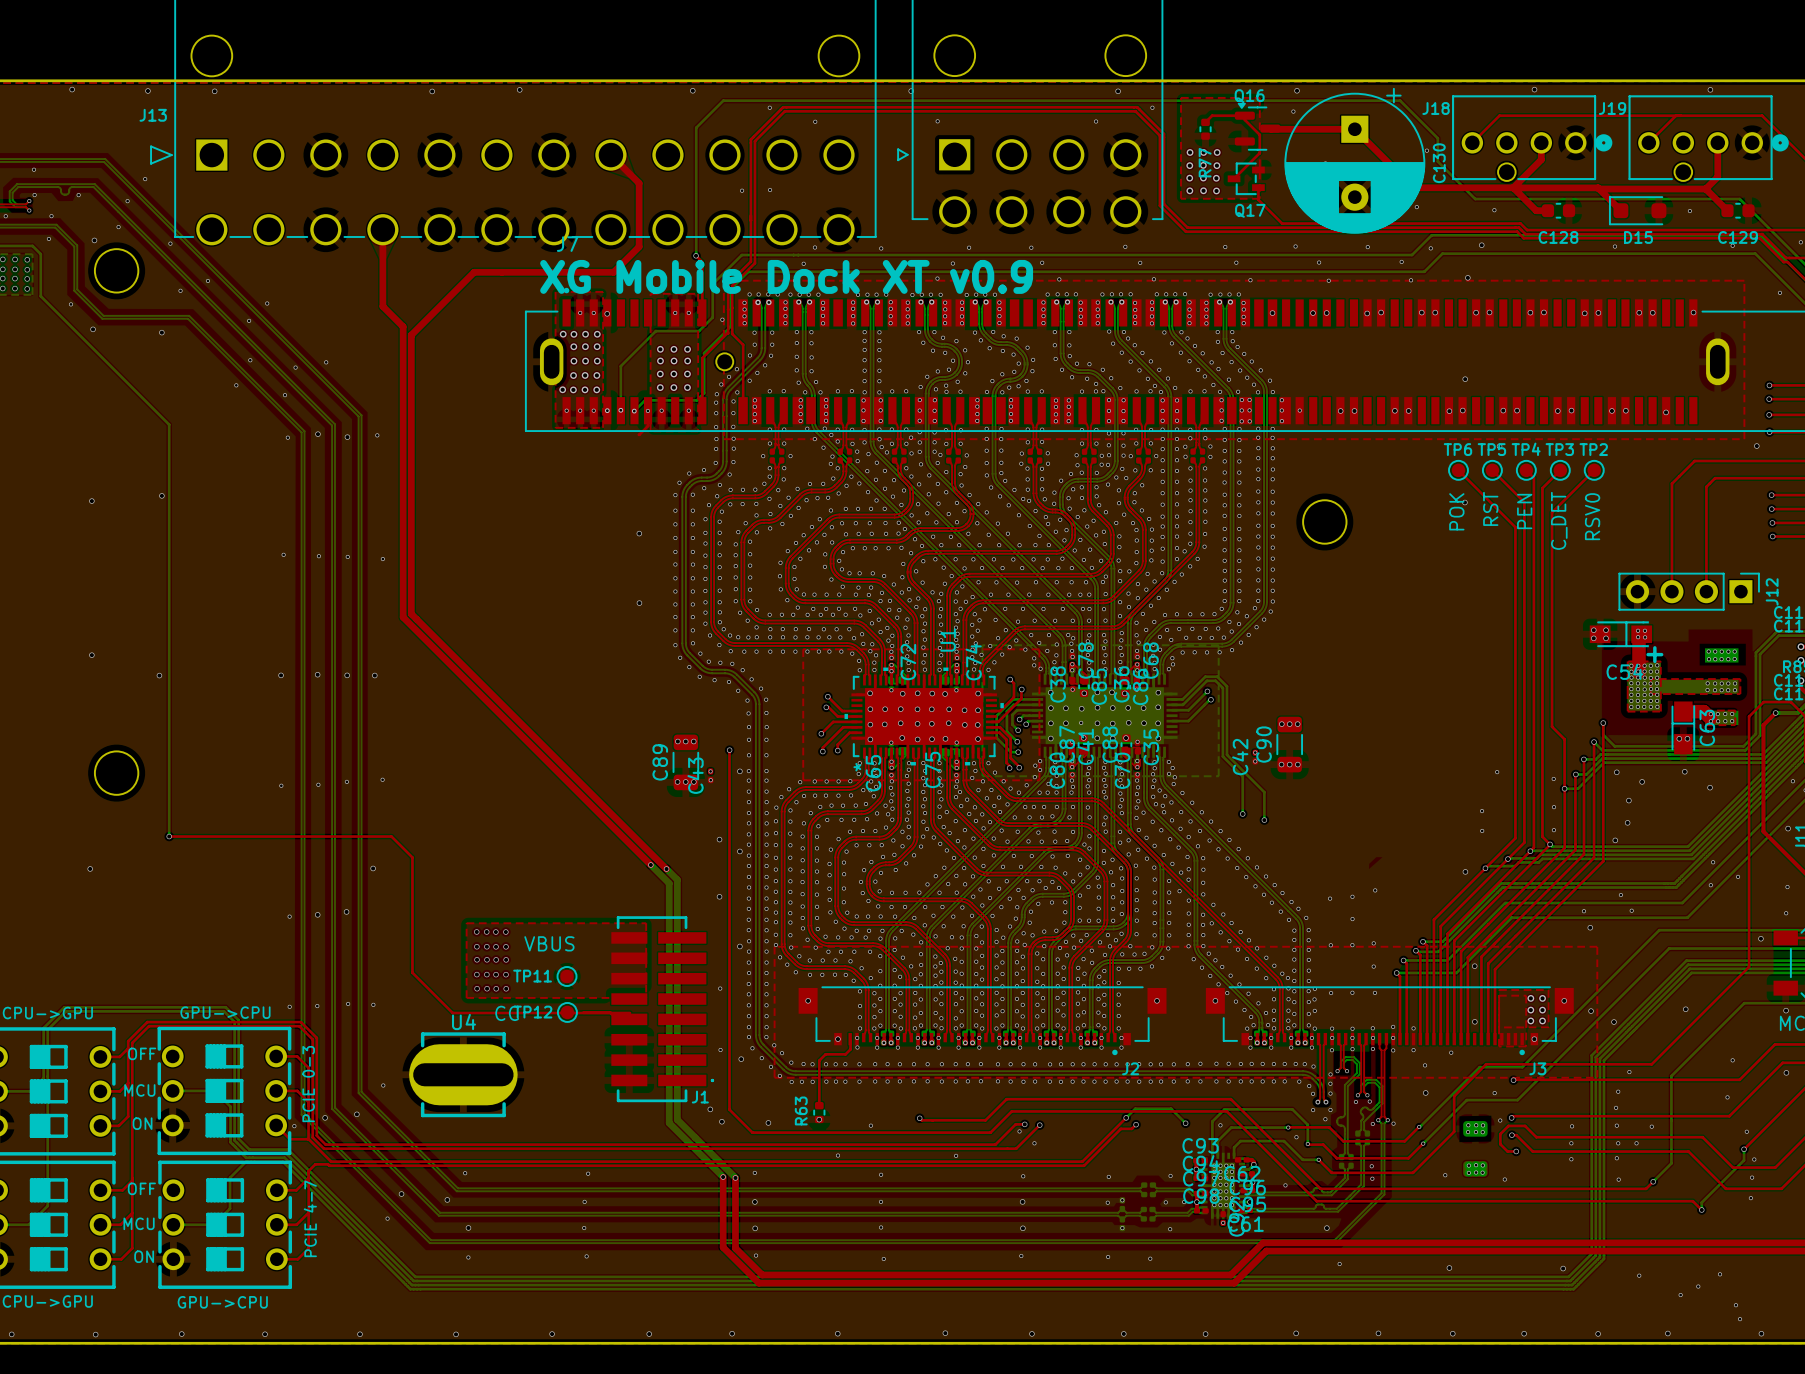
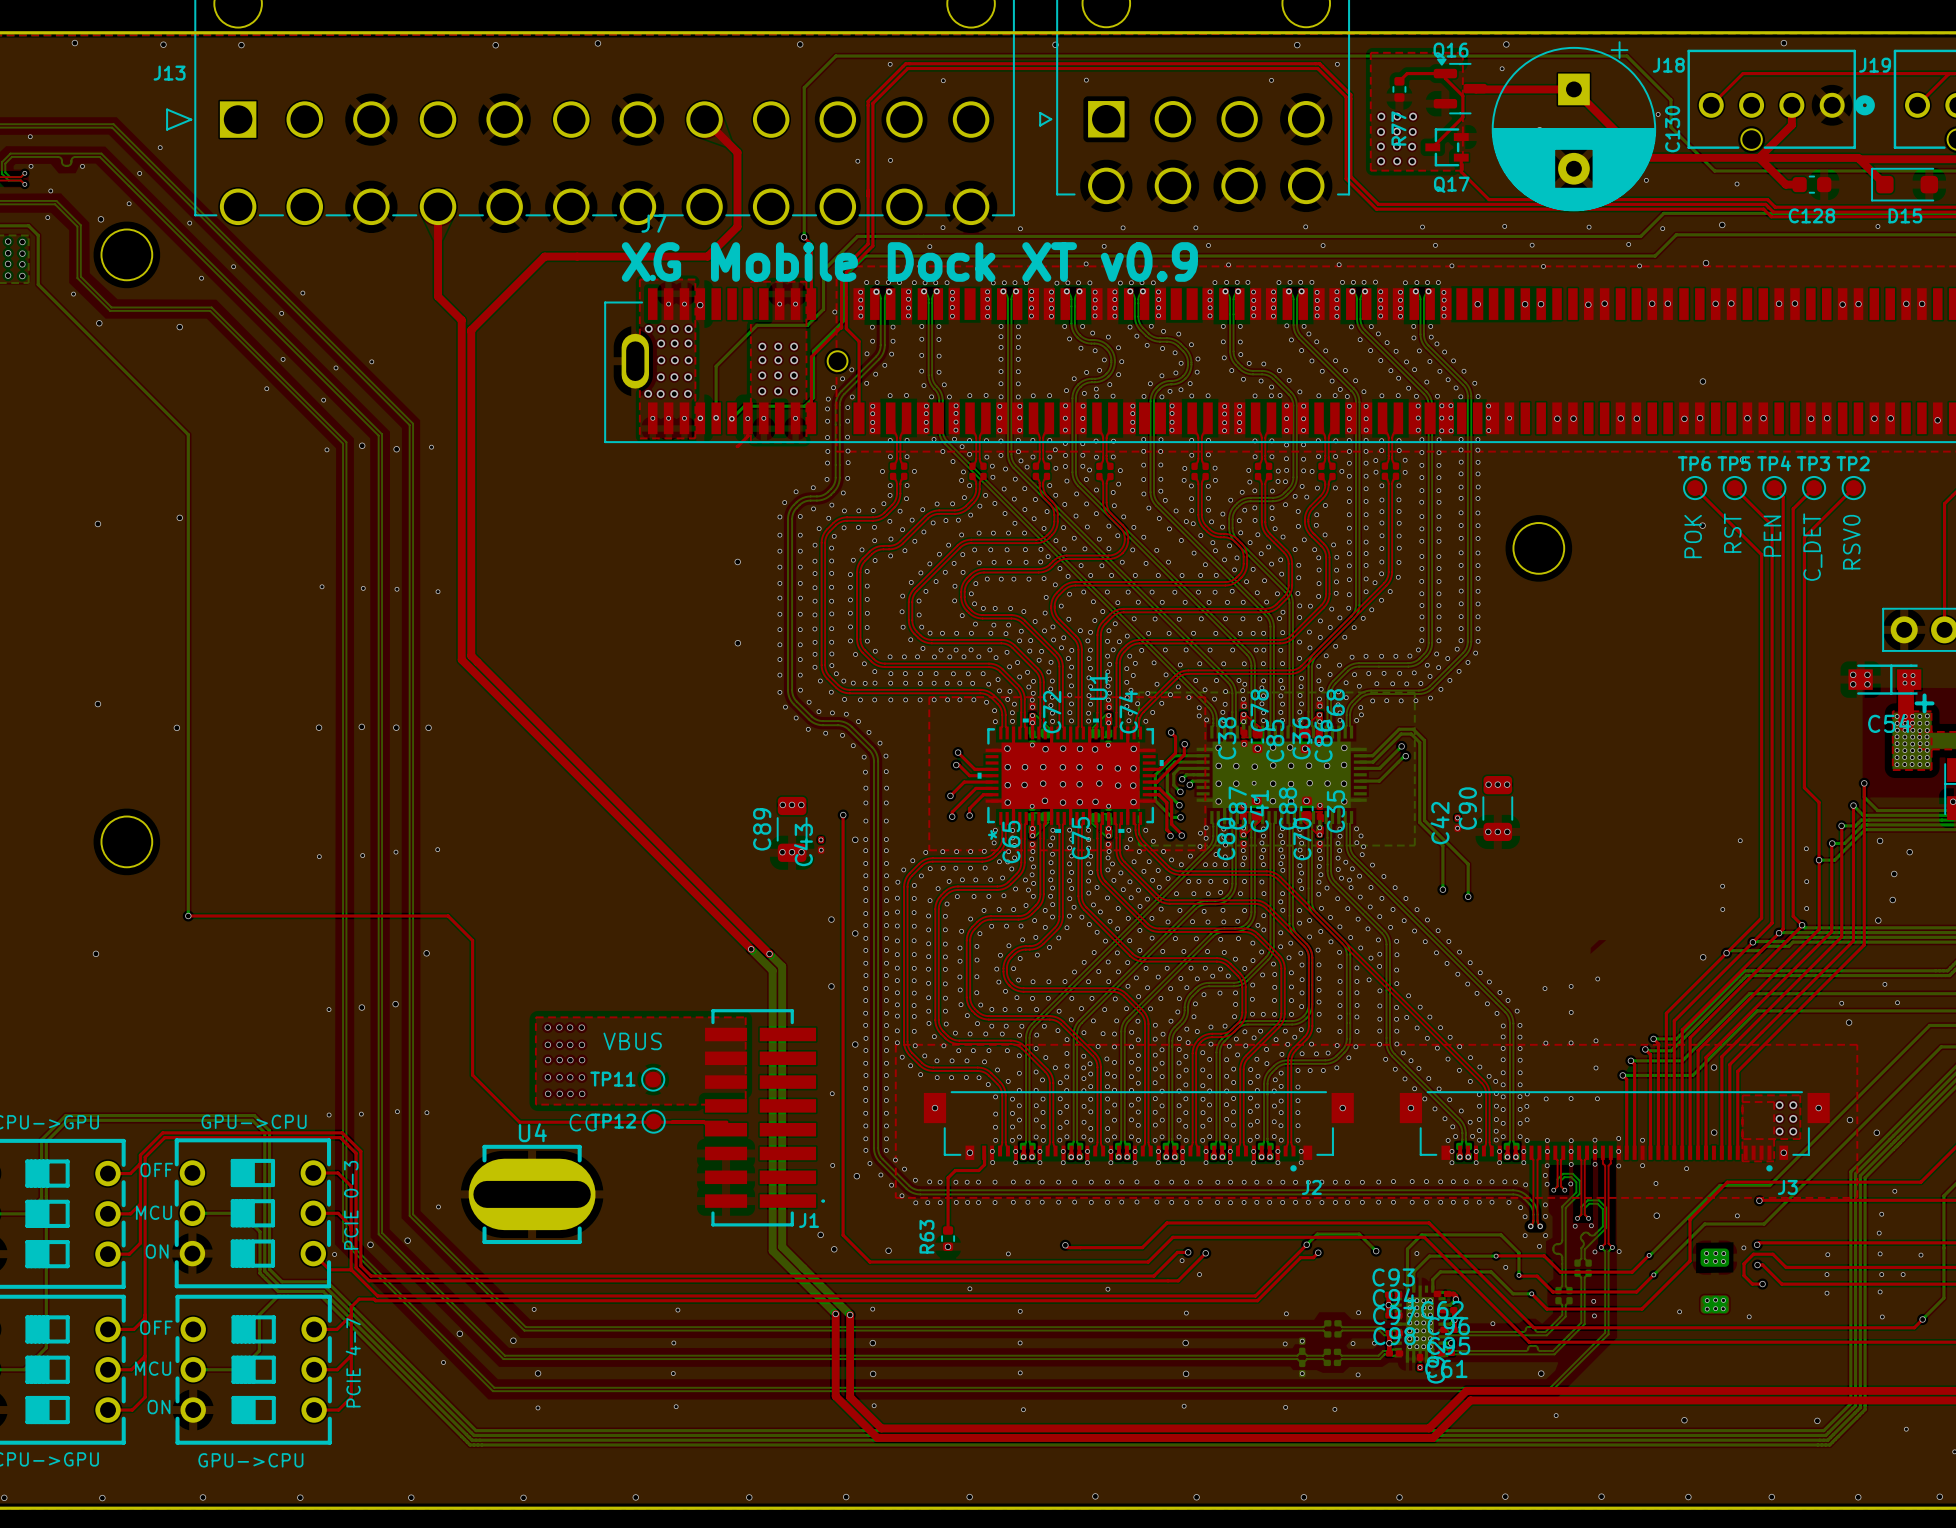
via: none -> (1545, 1175)
via: none -> (1570, 1183)
via: none -> (1547, 1184)
via: (1330, 1074) -> none

